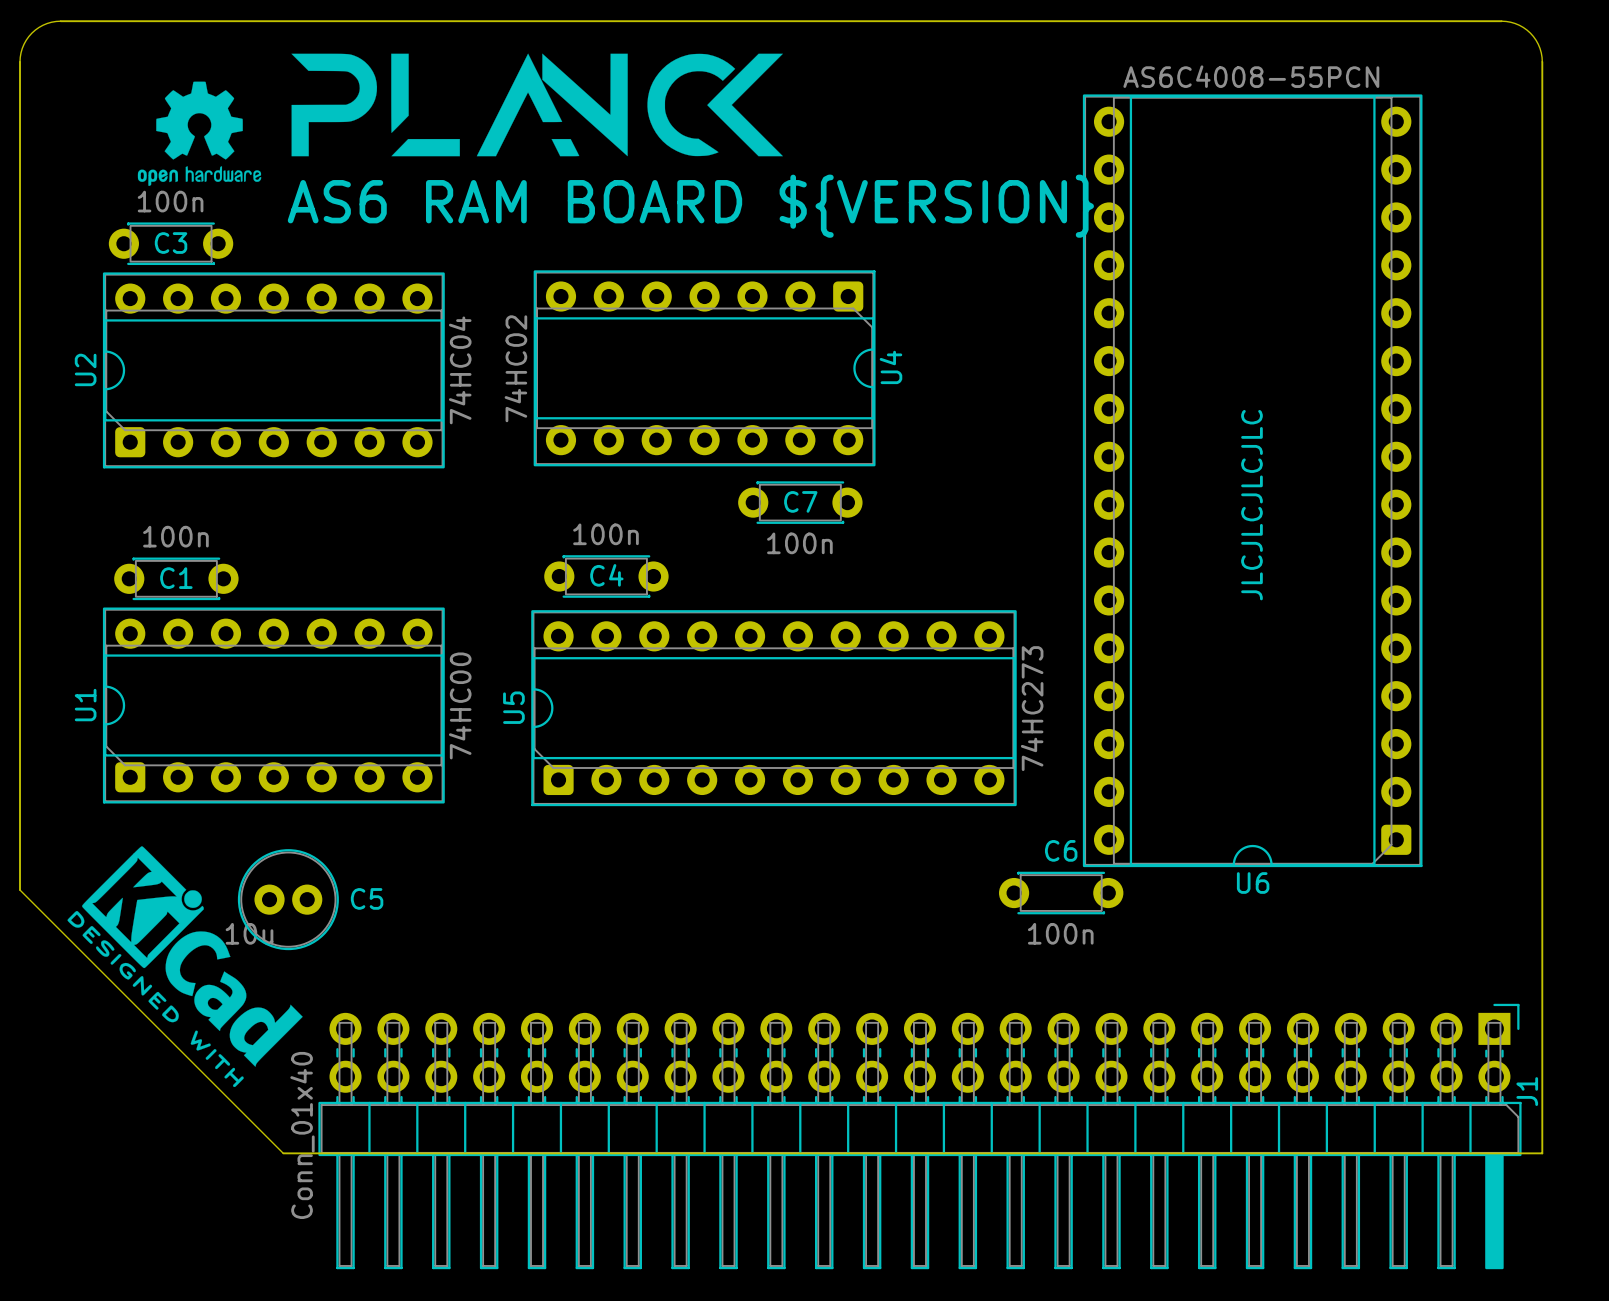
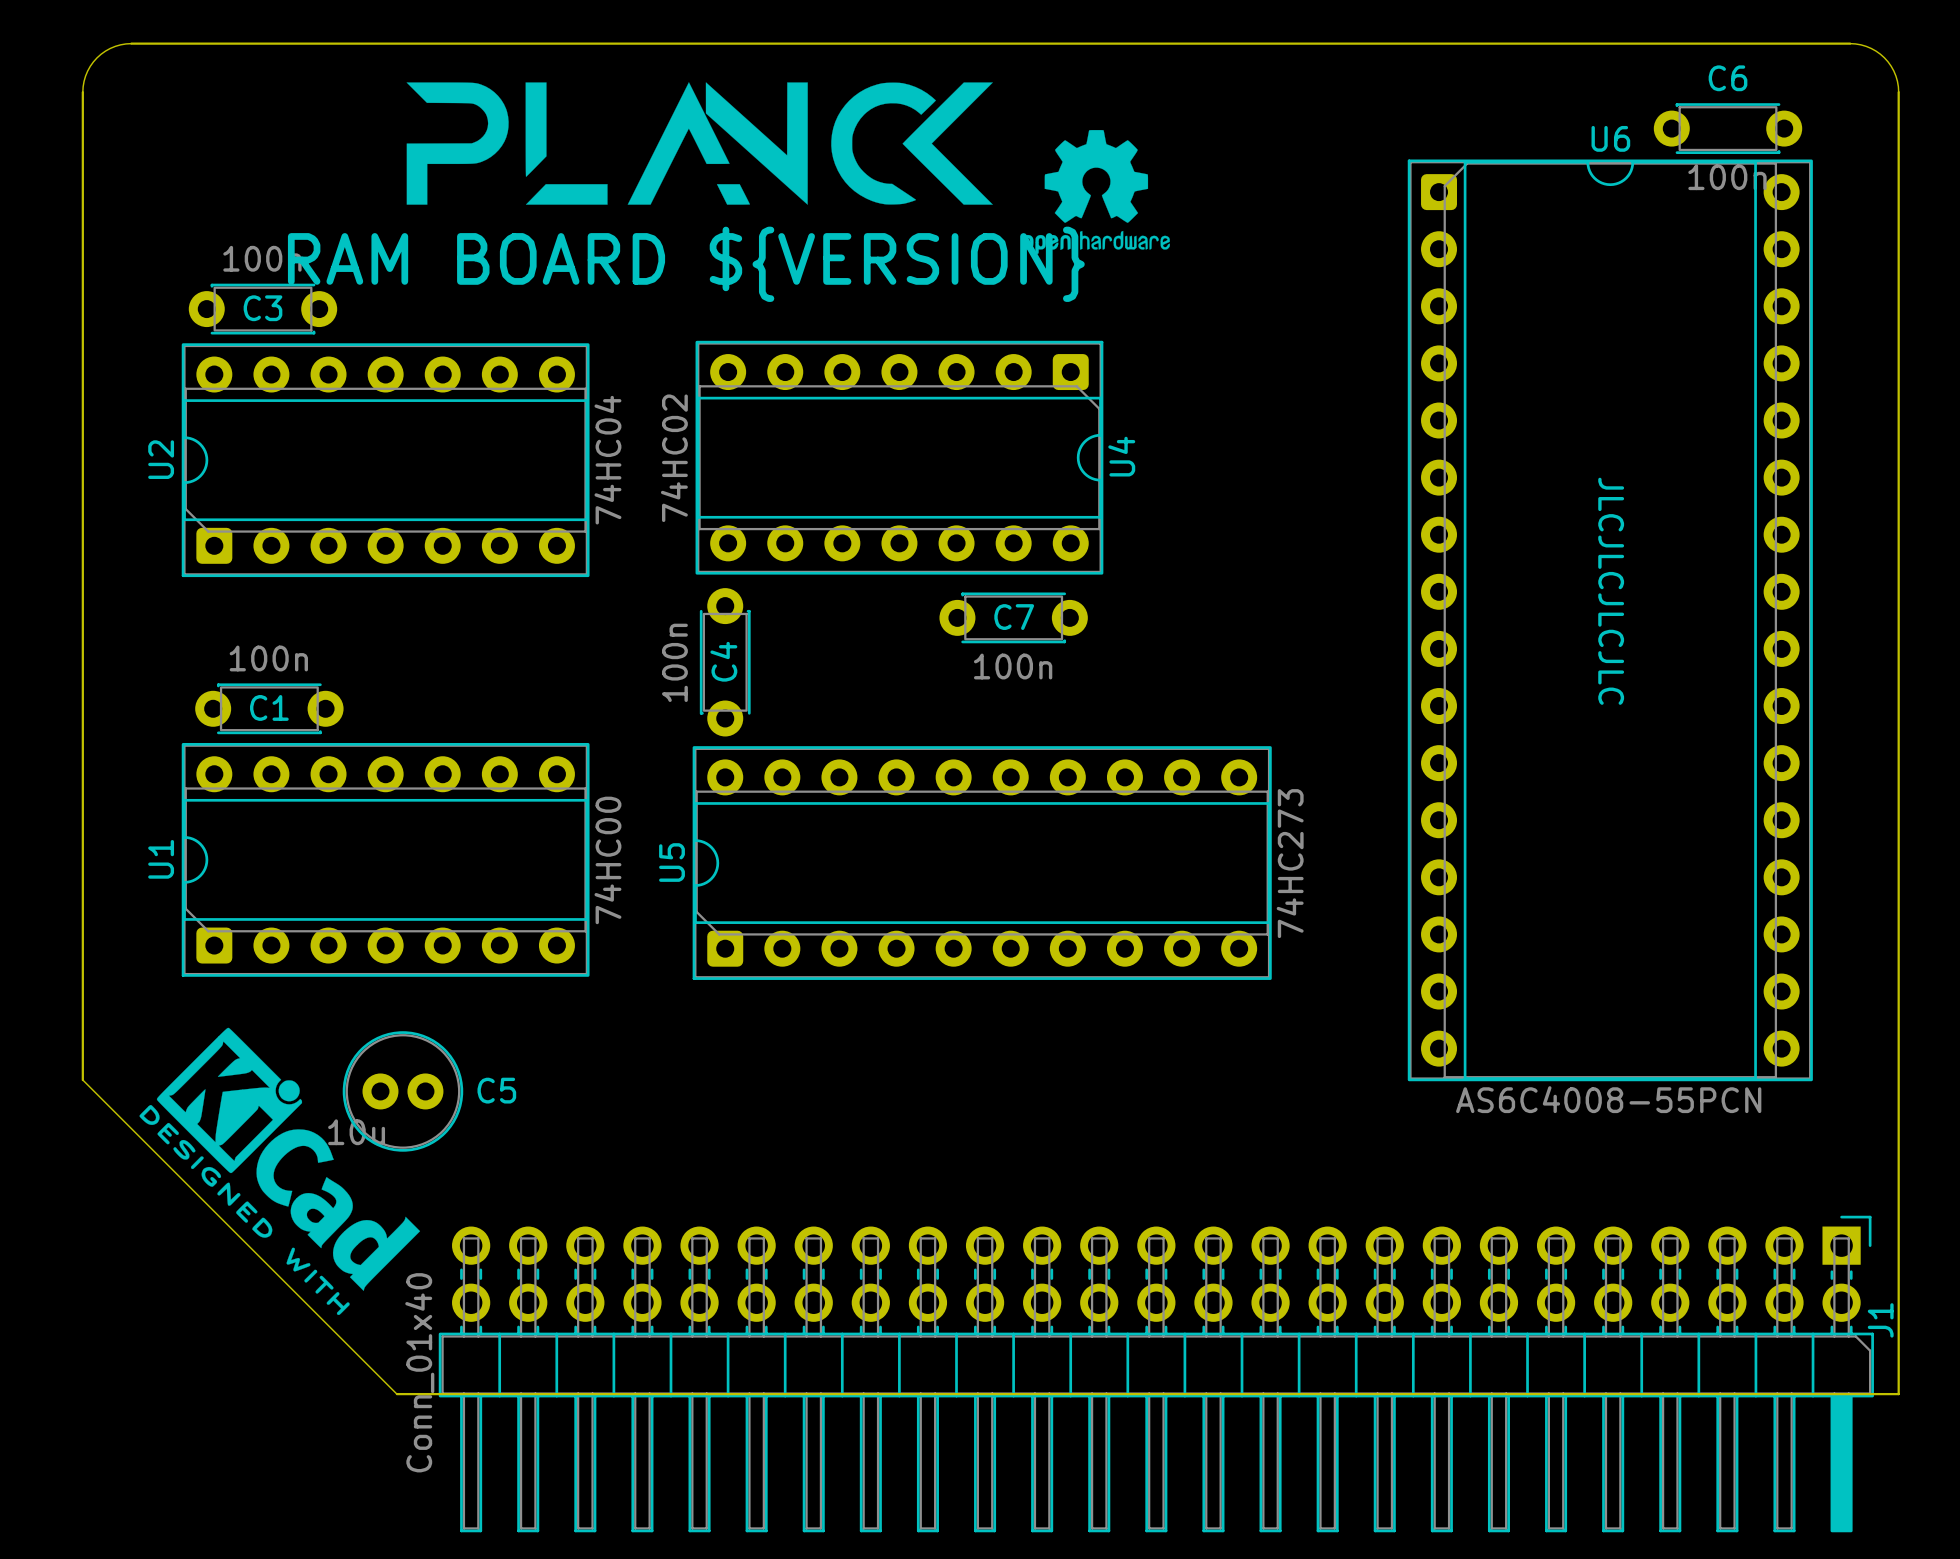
drawing: [137, 81, 262, 187] -> none
drawing: none -> [1022, 129, 1170, 255]
text: AS6 RAM BOARD ${VERSION} (690, 206) -> RAM BOARD ${VERSION} (686, 264)
U6 rotation: 0° (1252, 480) -> 180° (1610, 620)
text rotation: 0° (1251, 505) -> 180° (1611, 591)
C4 value position: 100n (605, 534) -> 100n (674, 662)
C4 rotation: 0° (606, 576) -> 90° clockwise (725, 662)
C6 position: (1061, 893) -> (1728, 128)

